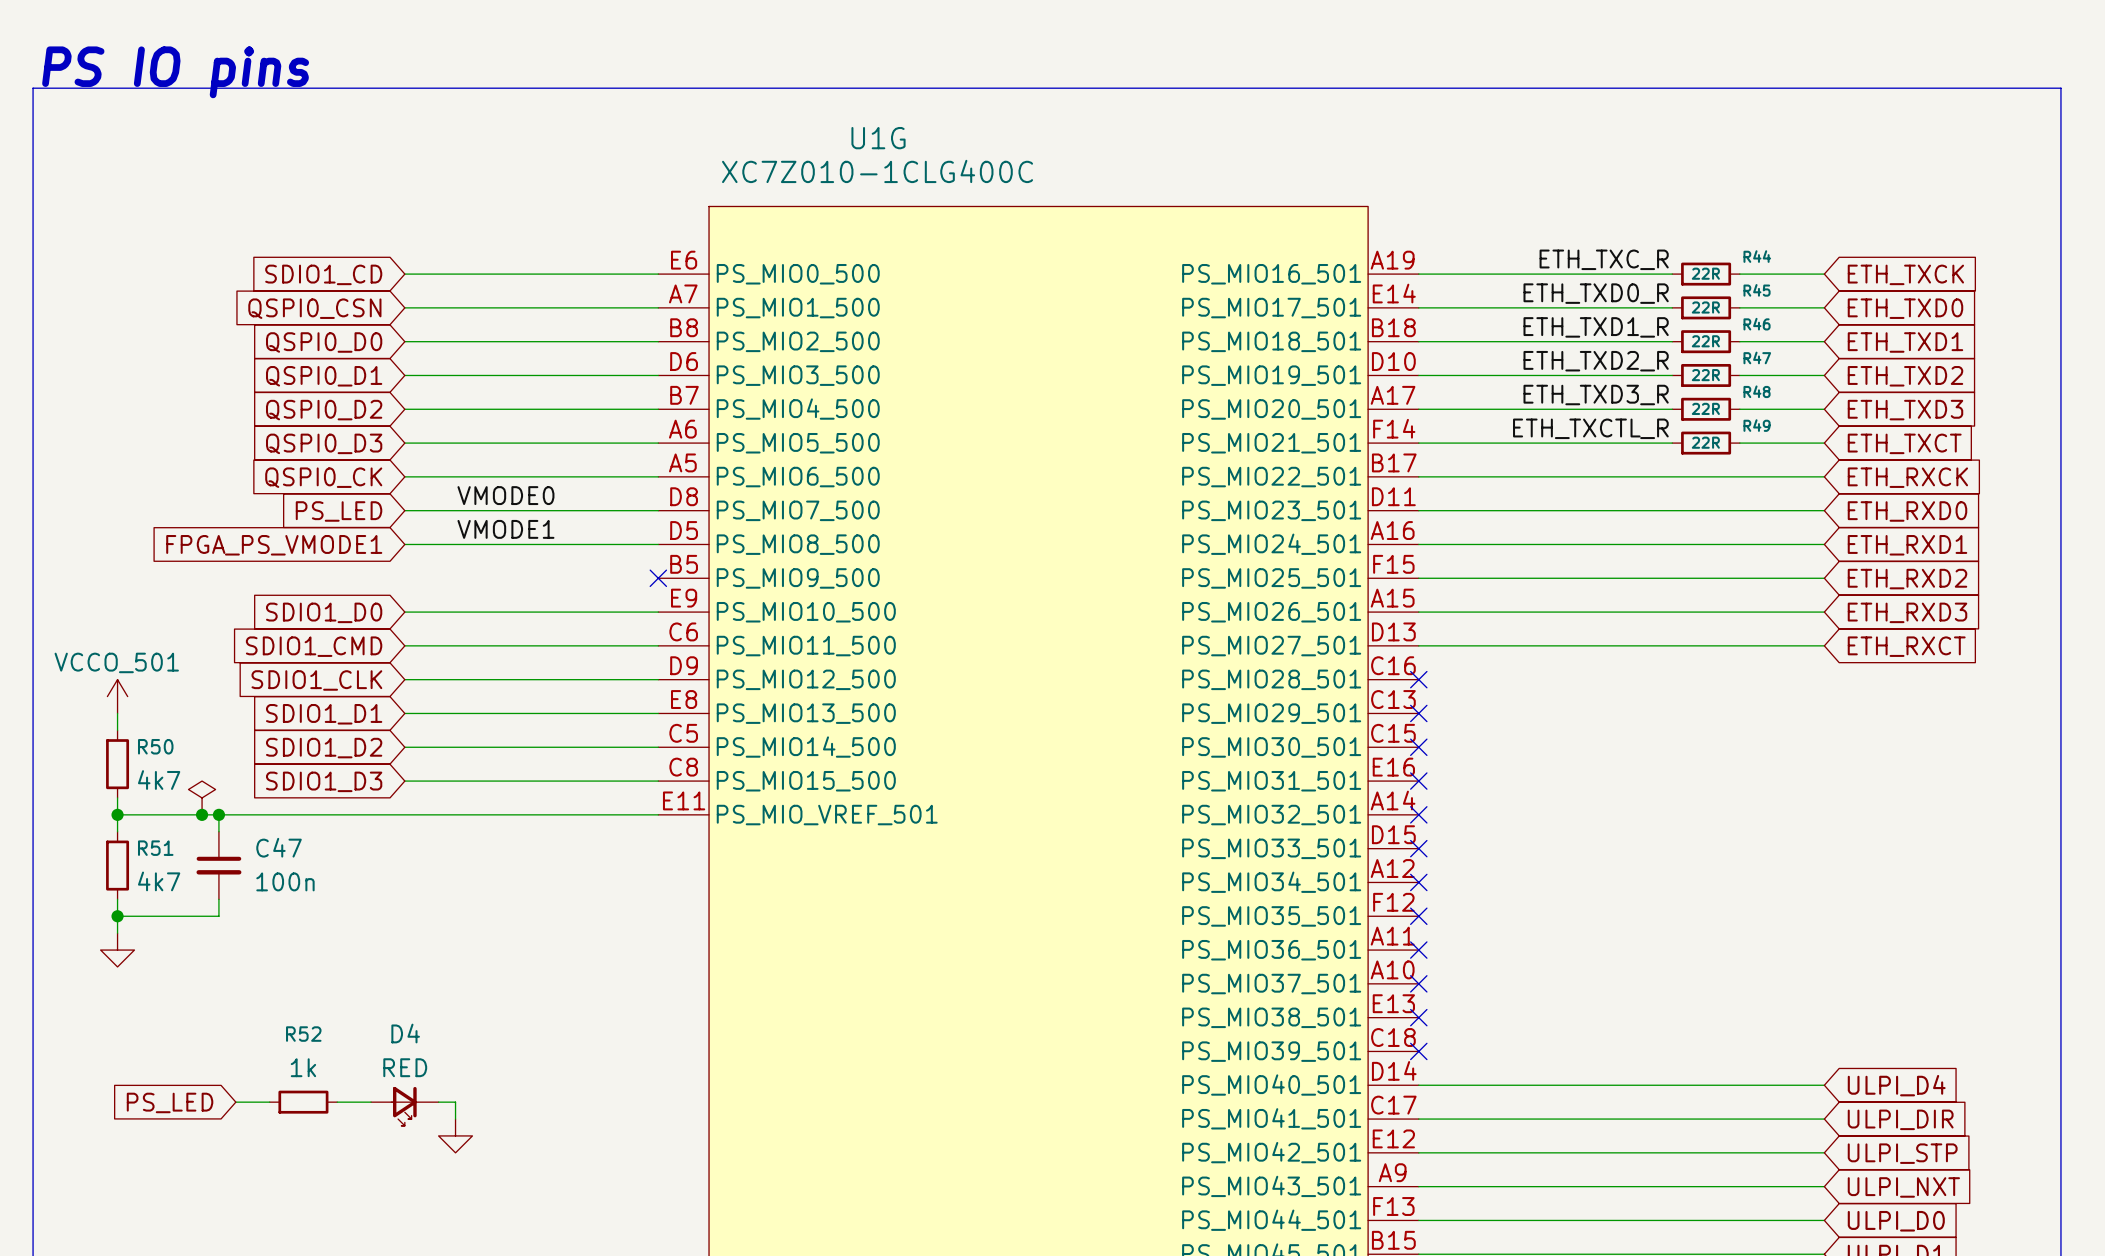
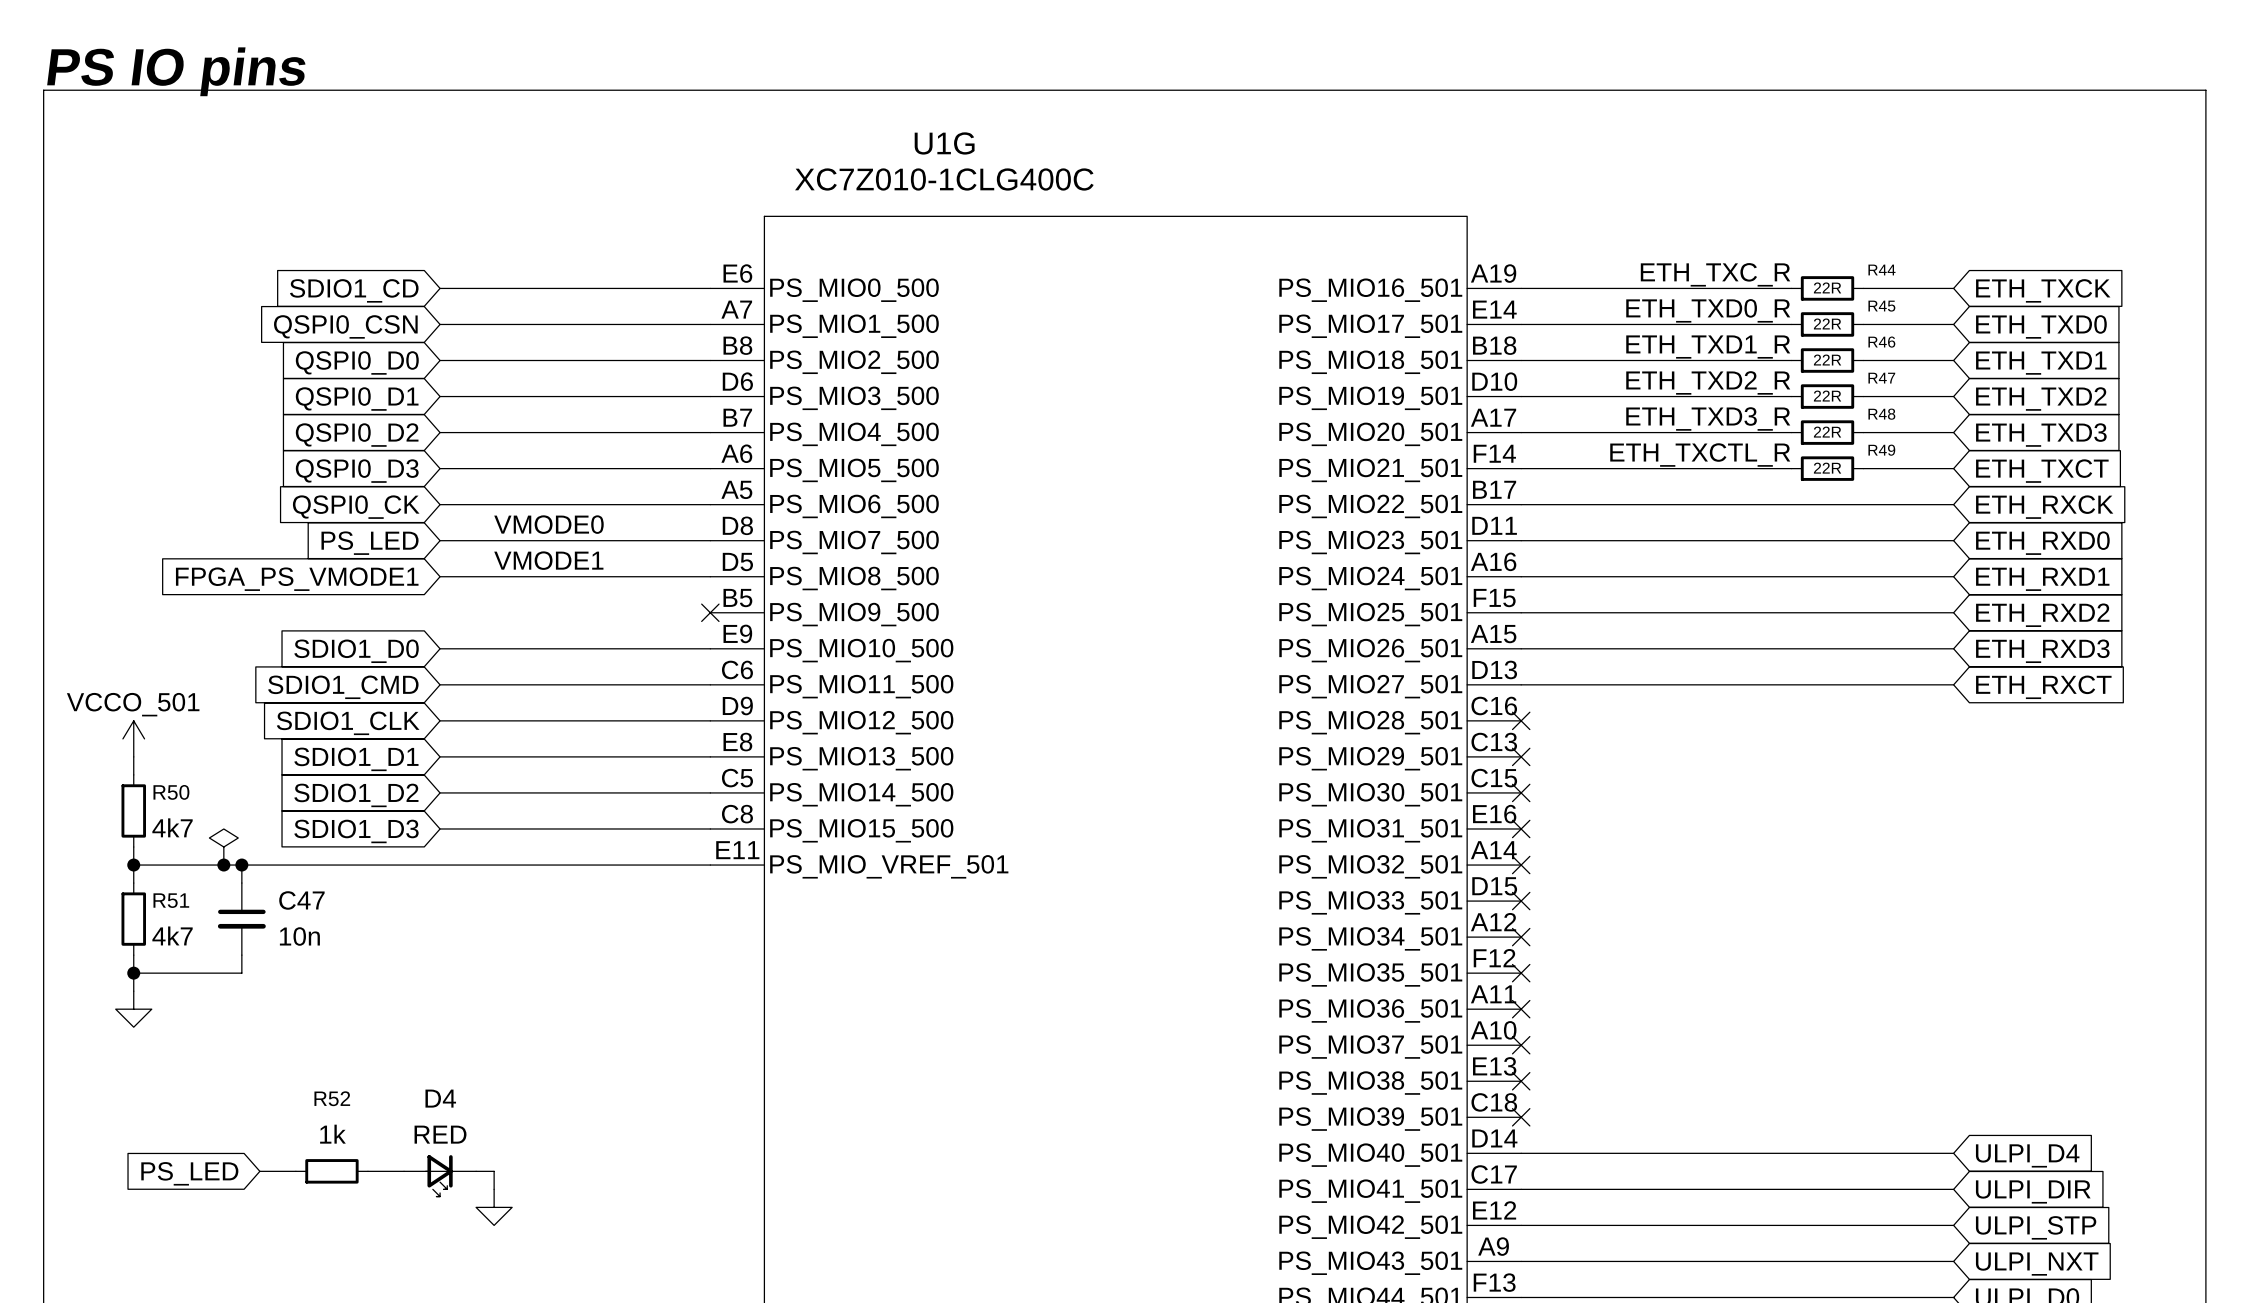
C47 value: 100n (285, 881) -> 10n (299, 936)

